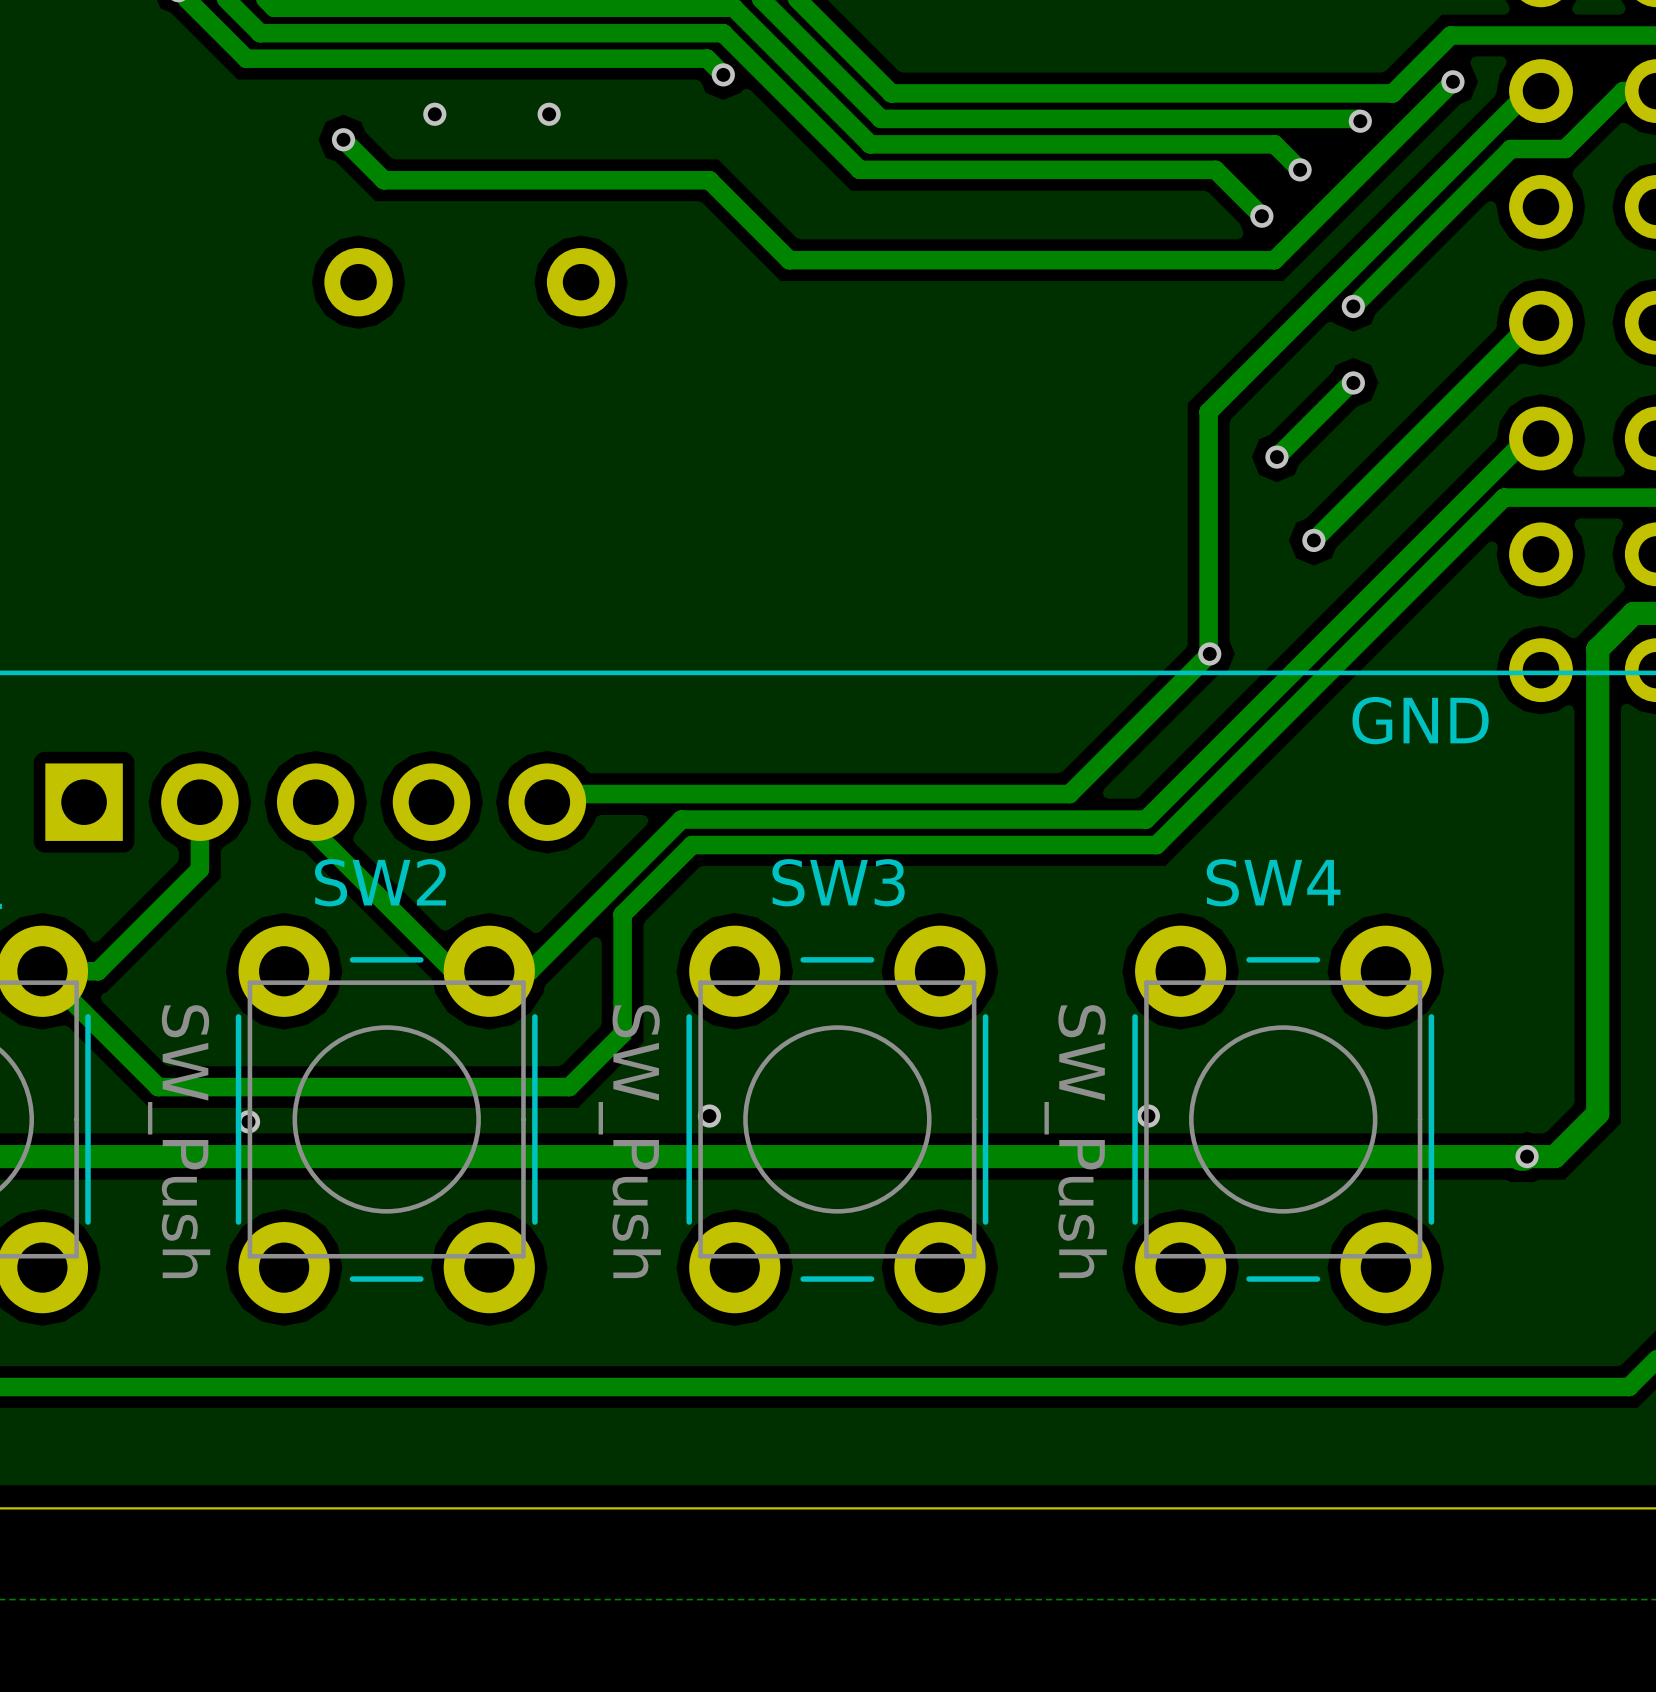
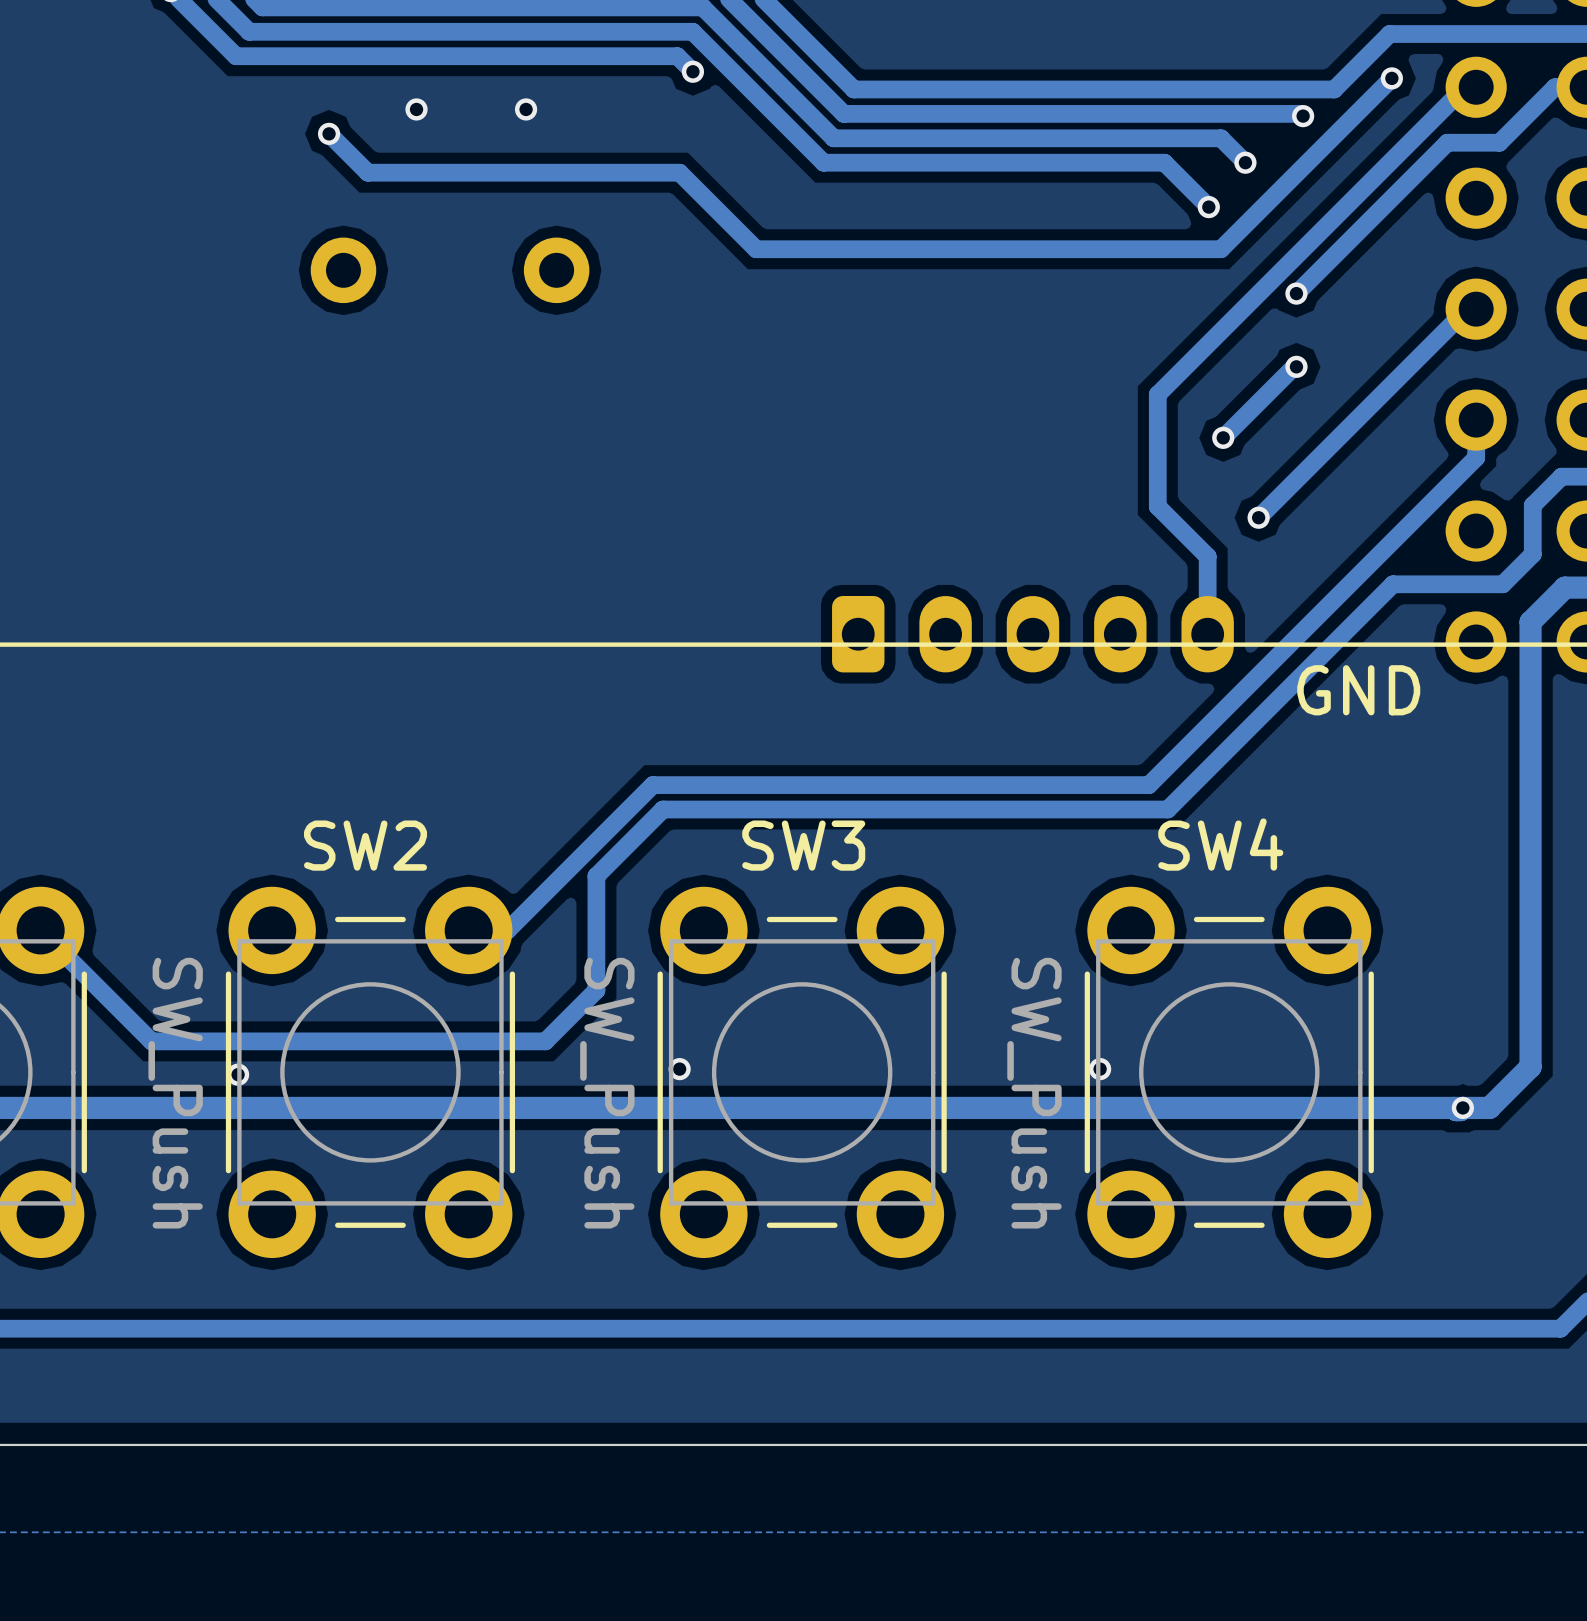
track: (1527, 438) (1146, 819) -> (1476, 420) (1476, 457) (1148, 785) (1097, 785)
track: (1630, 497) (1504, 497) (1156, 845) -> (1561, 476) (1532, 505) (1532, 554) (1502, 584) (1392, 584) (1167, 809) (1107, 809)
track: (1208, 528) (1209, 653) (1069, 794) (581, 794) (547, 828) -> (1157, 506) (1207, 556) (1207, 634)
via: (1209, 653) -> none
part: none -> (1032, 634)
track: (199, 802) (199, 869) (97, 971) (42, 971) -> none
track: (315, 802) (315, 833) (453, 971) -> none
part: (315, 802) -> none

